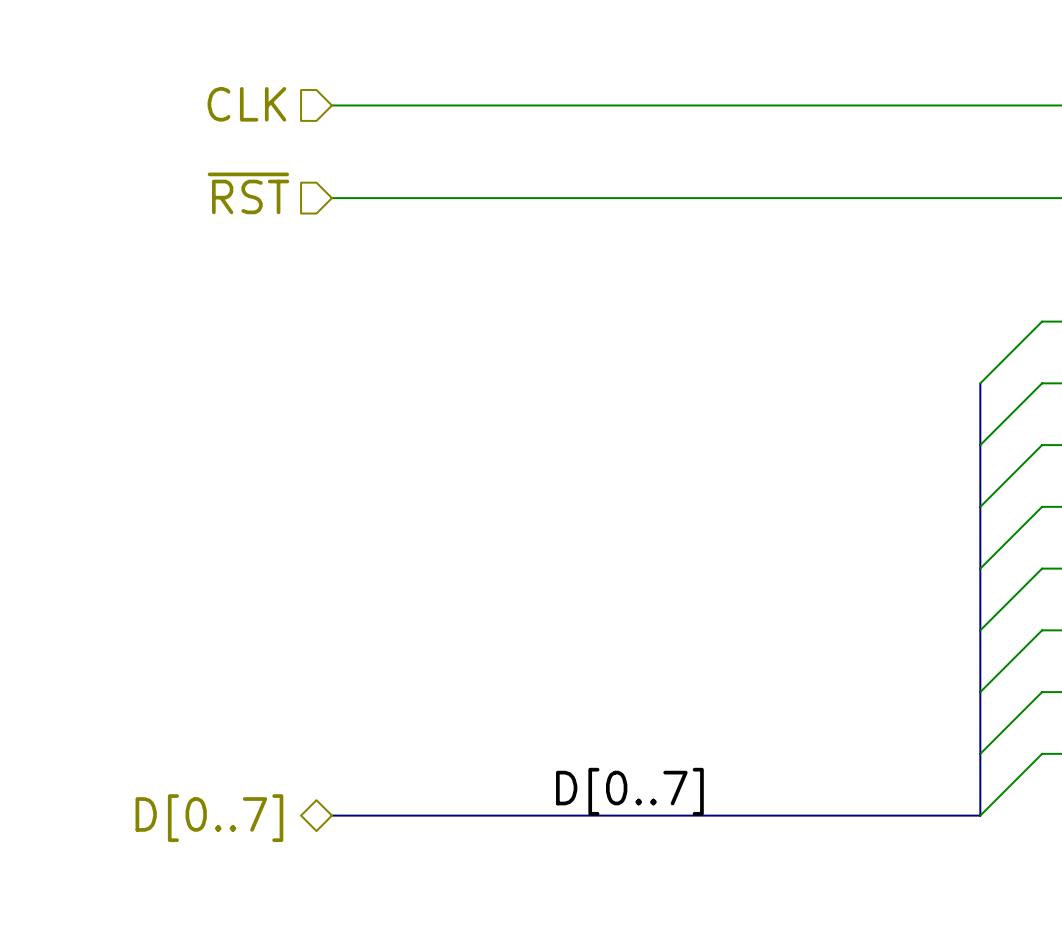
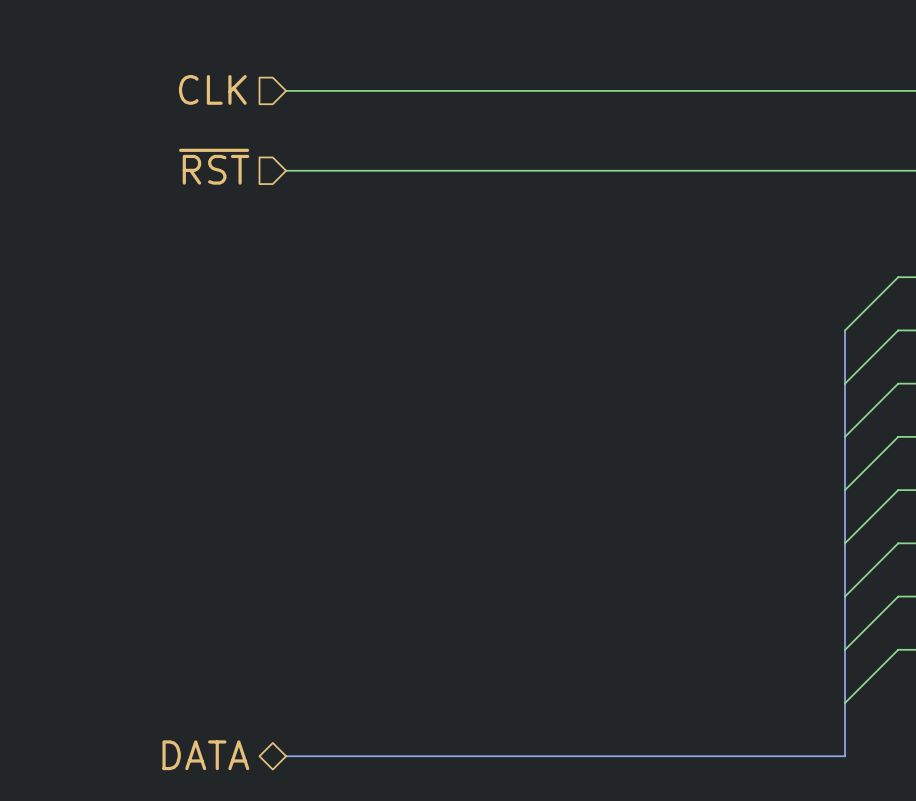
label: D[0..7] (629, 791) -> none
bus: (331, 815) (980, 815) -> (286, 756) (845, 756) (845, 703)
hierarchical label: D[0..7] (209, 818) -> none
hierarchical label: none -> DATA (205, 755)

